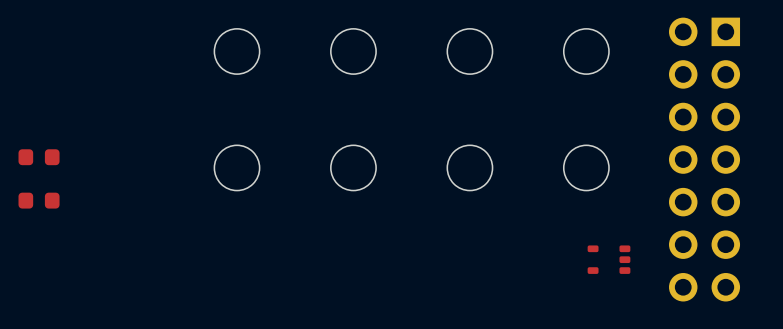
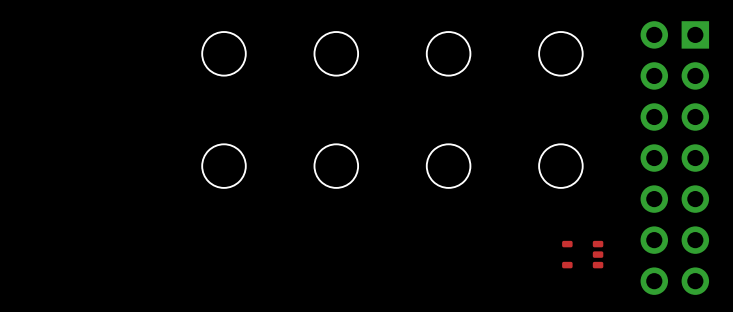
part: (39, 157) -> none
part: (39, 200) -> none

